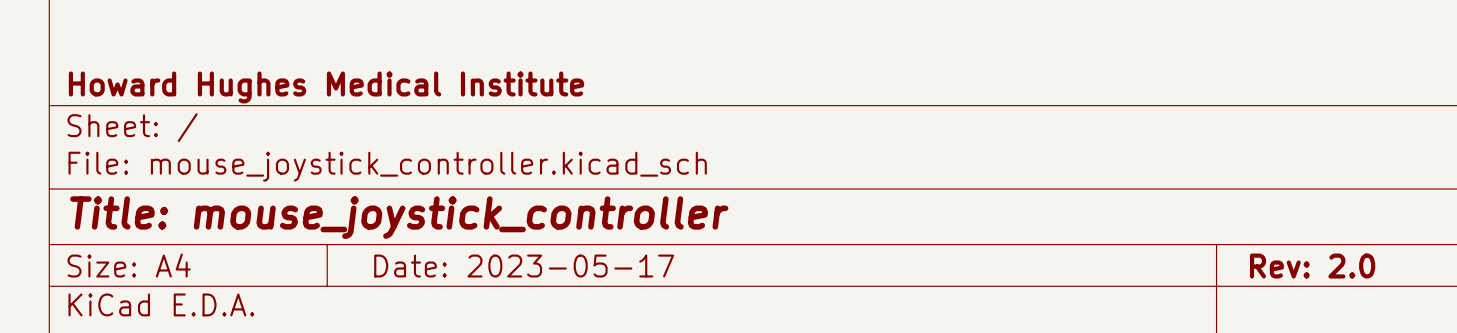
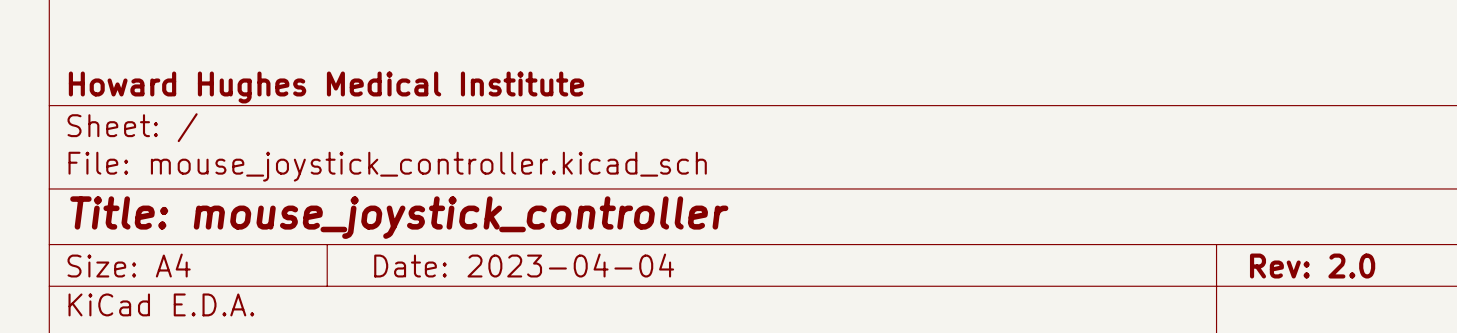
title block: Date: 2023-05-17 (524, 266) -> Date: 2023-04-04 (524, 265)

